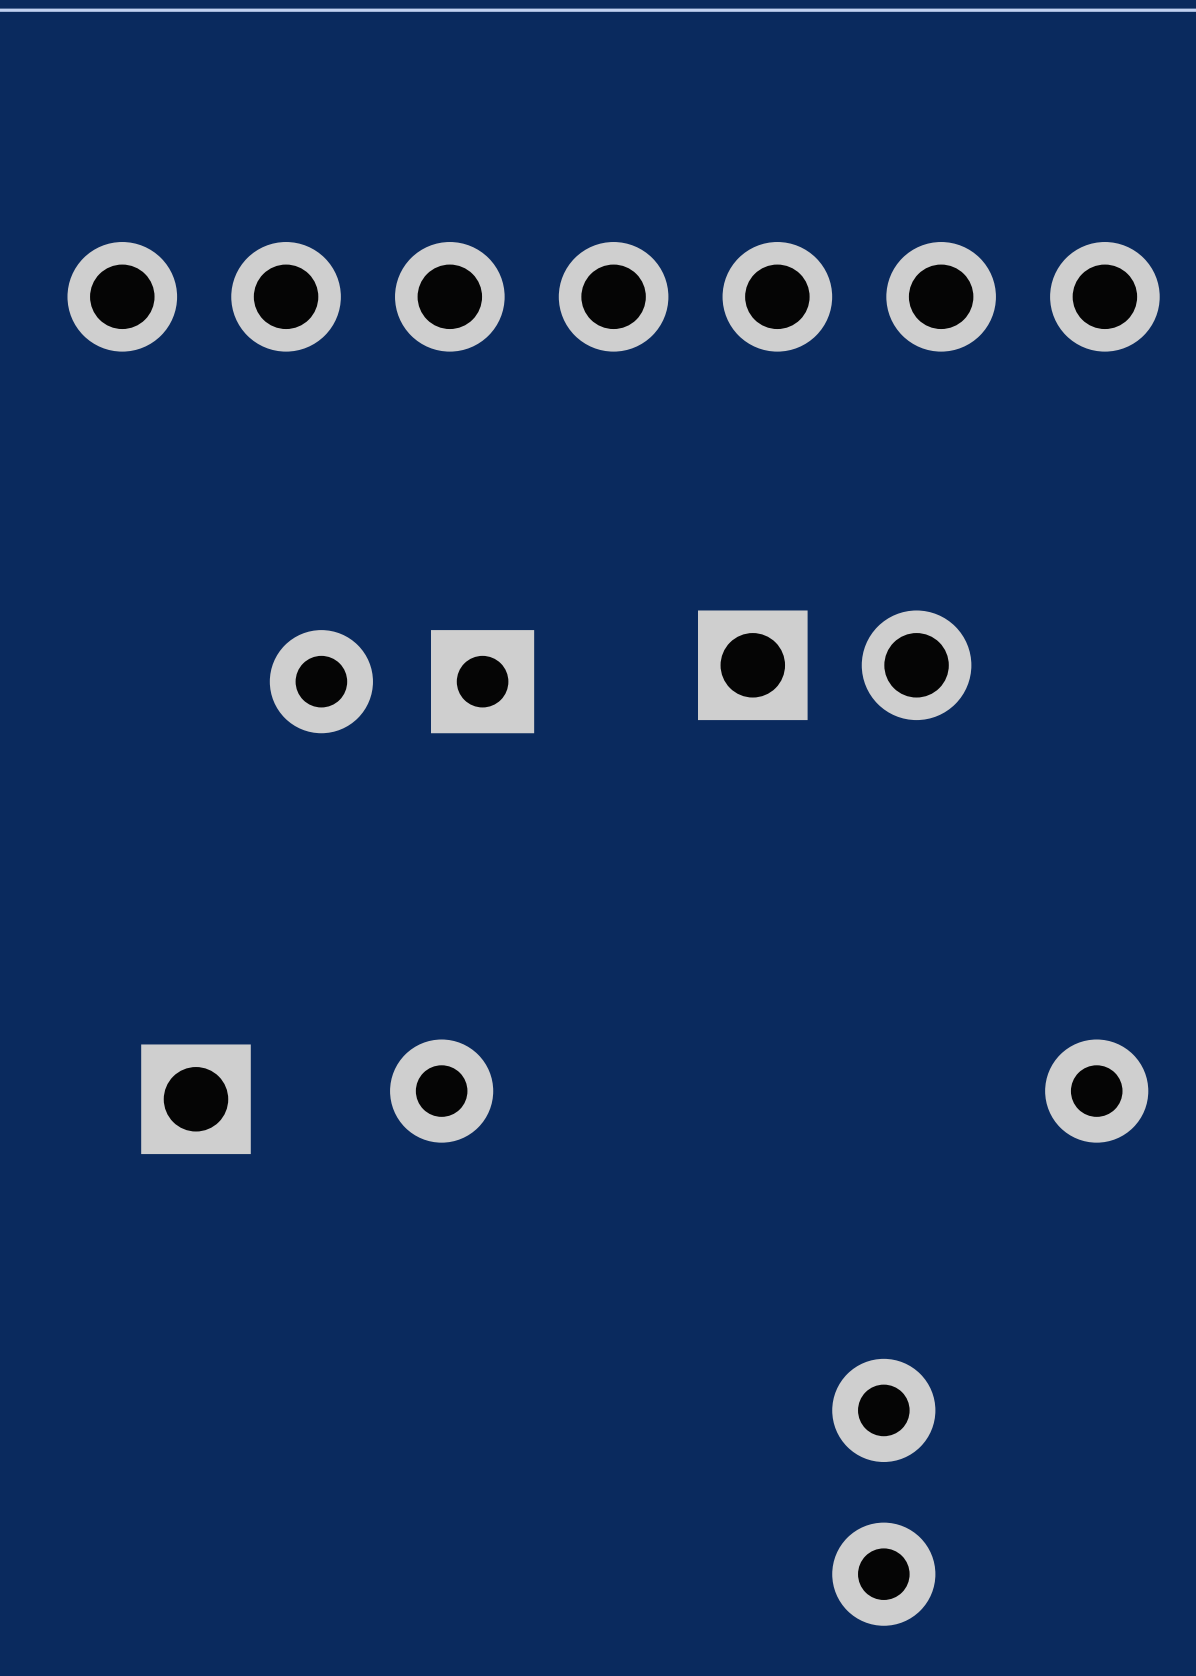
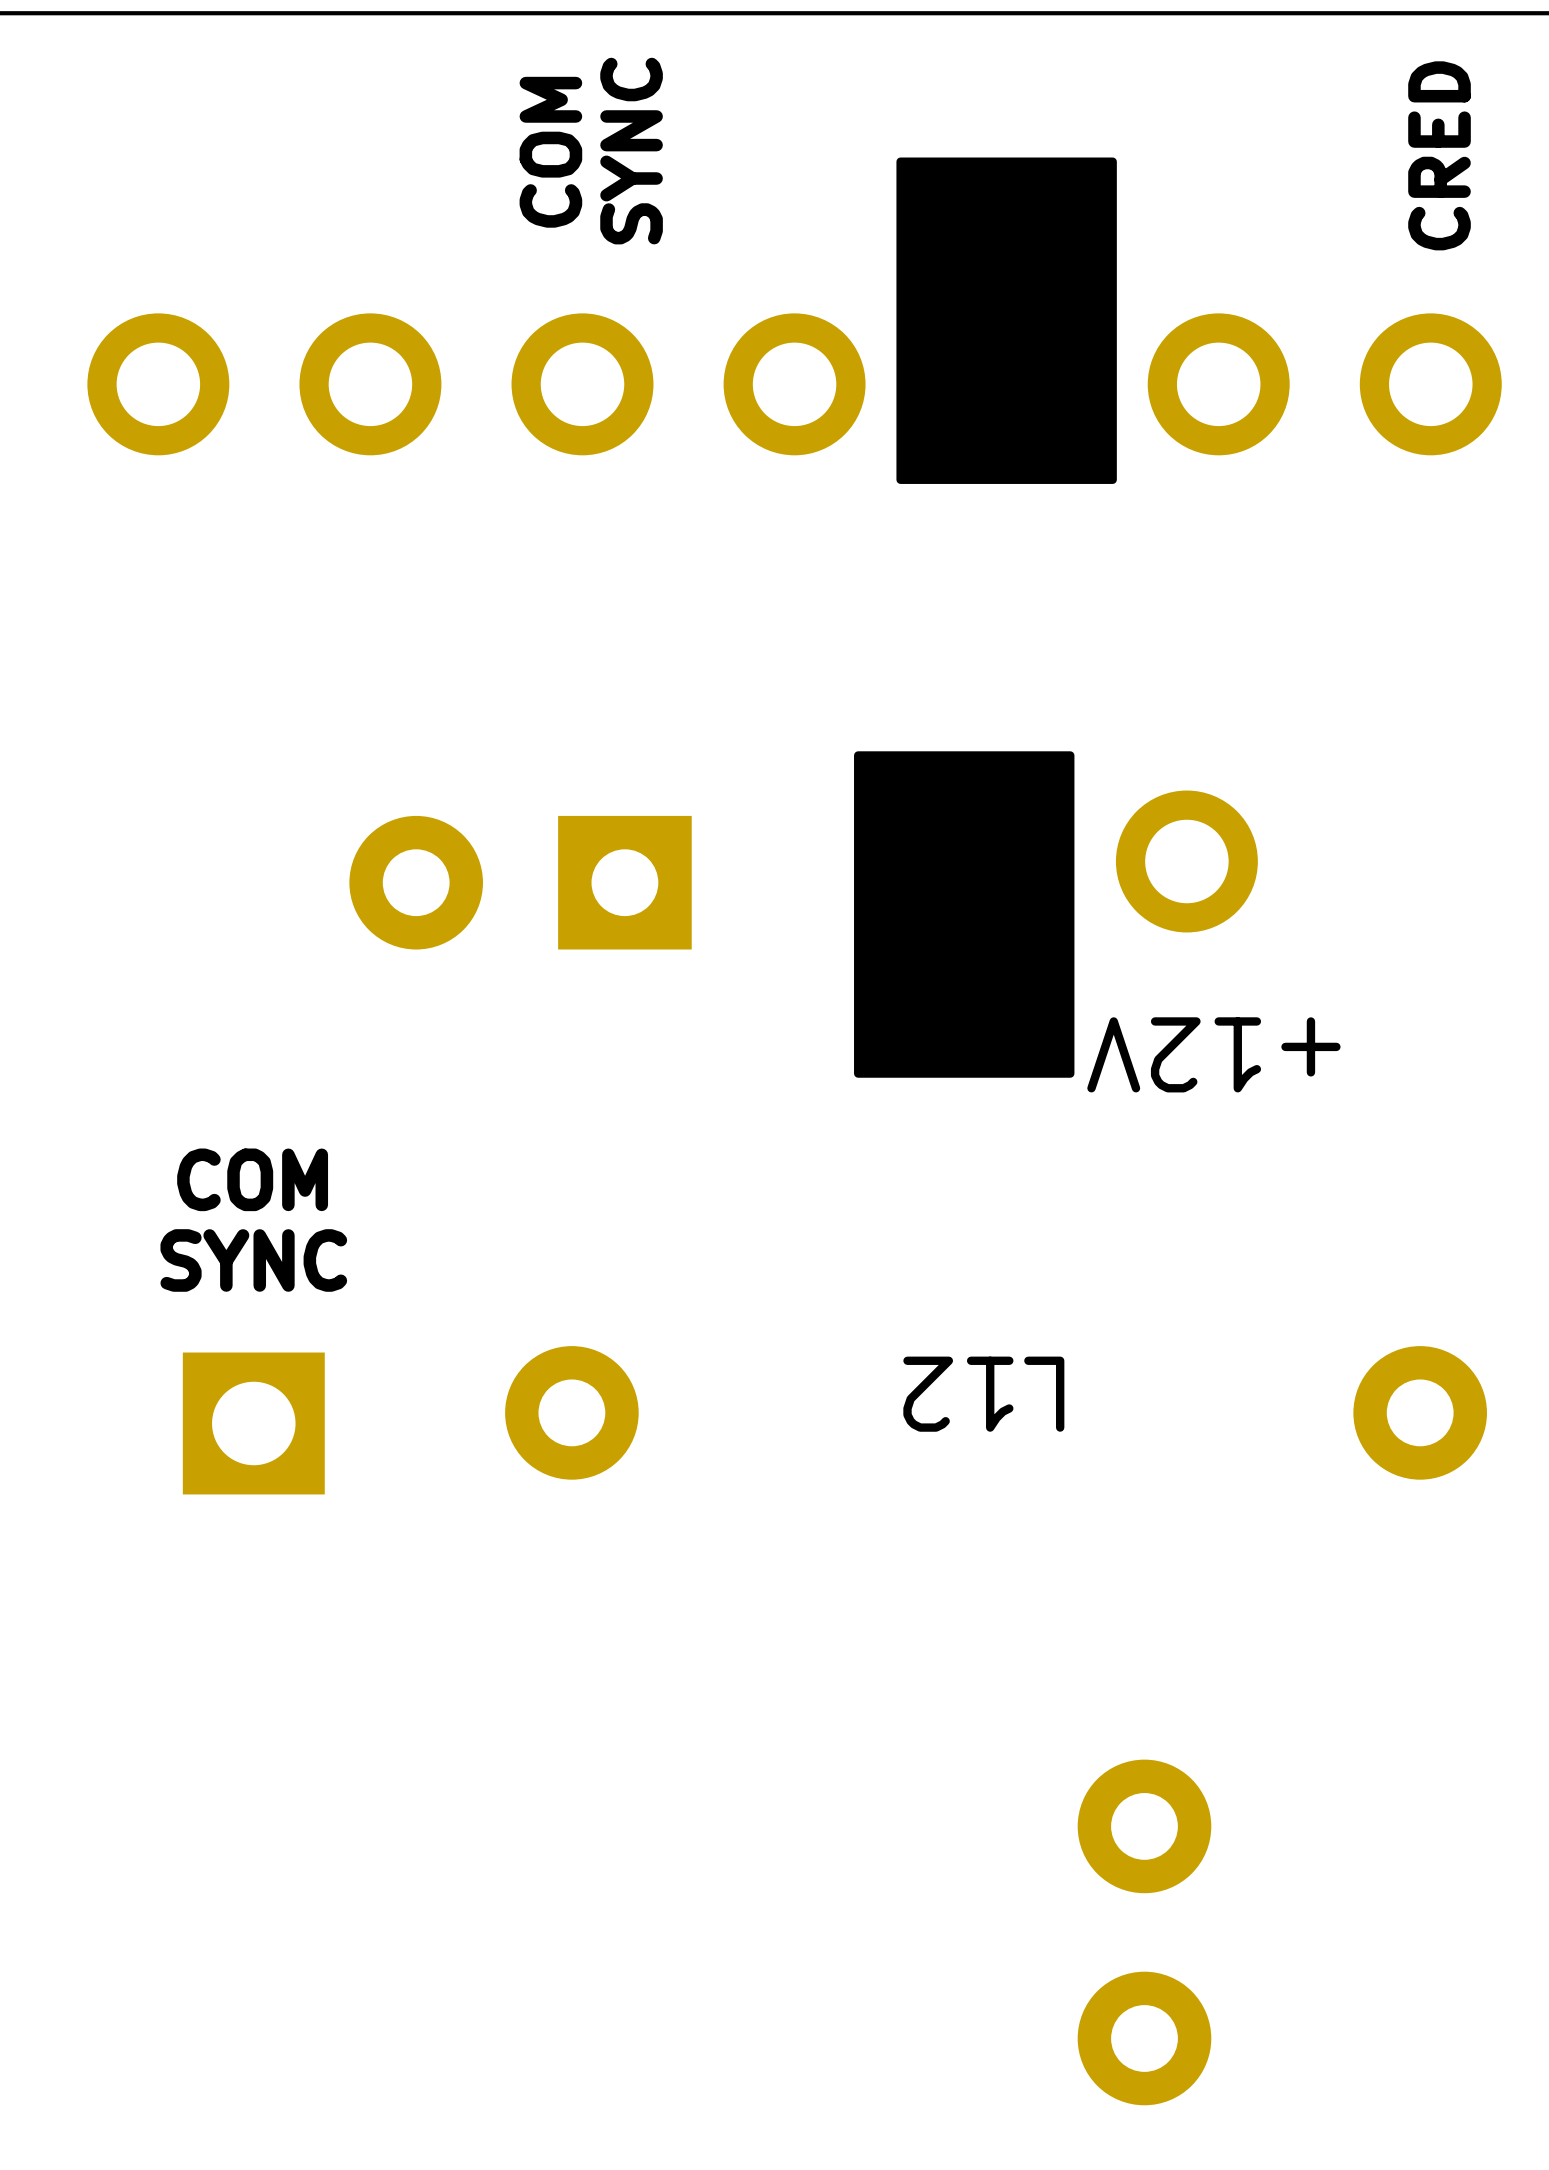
text: none -> SYNC (631, 151)
text: none -> COM (550, 152)
text: none -> CRED (1439, 155)
drawing: none -> [896, 157, 1117, 484]
drawing: none -> [854, 751, 1075, 1078]
text: none -> +12V (1213, 1054)
text: none -> COM (252, 1179)
text: none -> SYNC (253, 1260)
text: none -> L12 (983, 1394)

